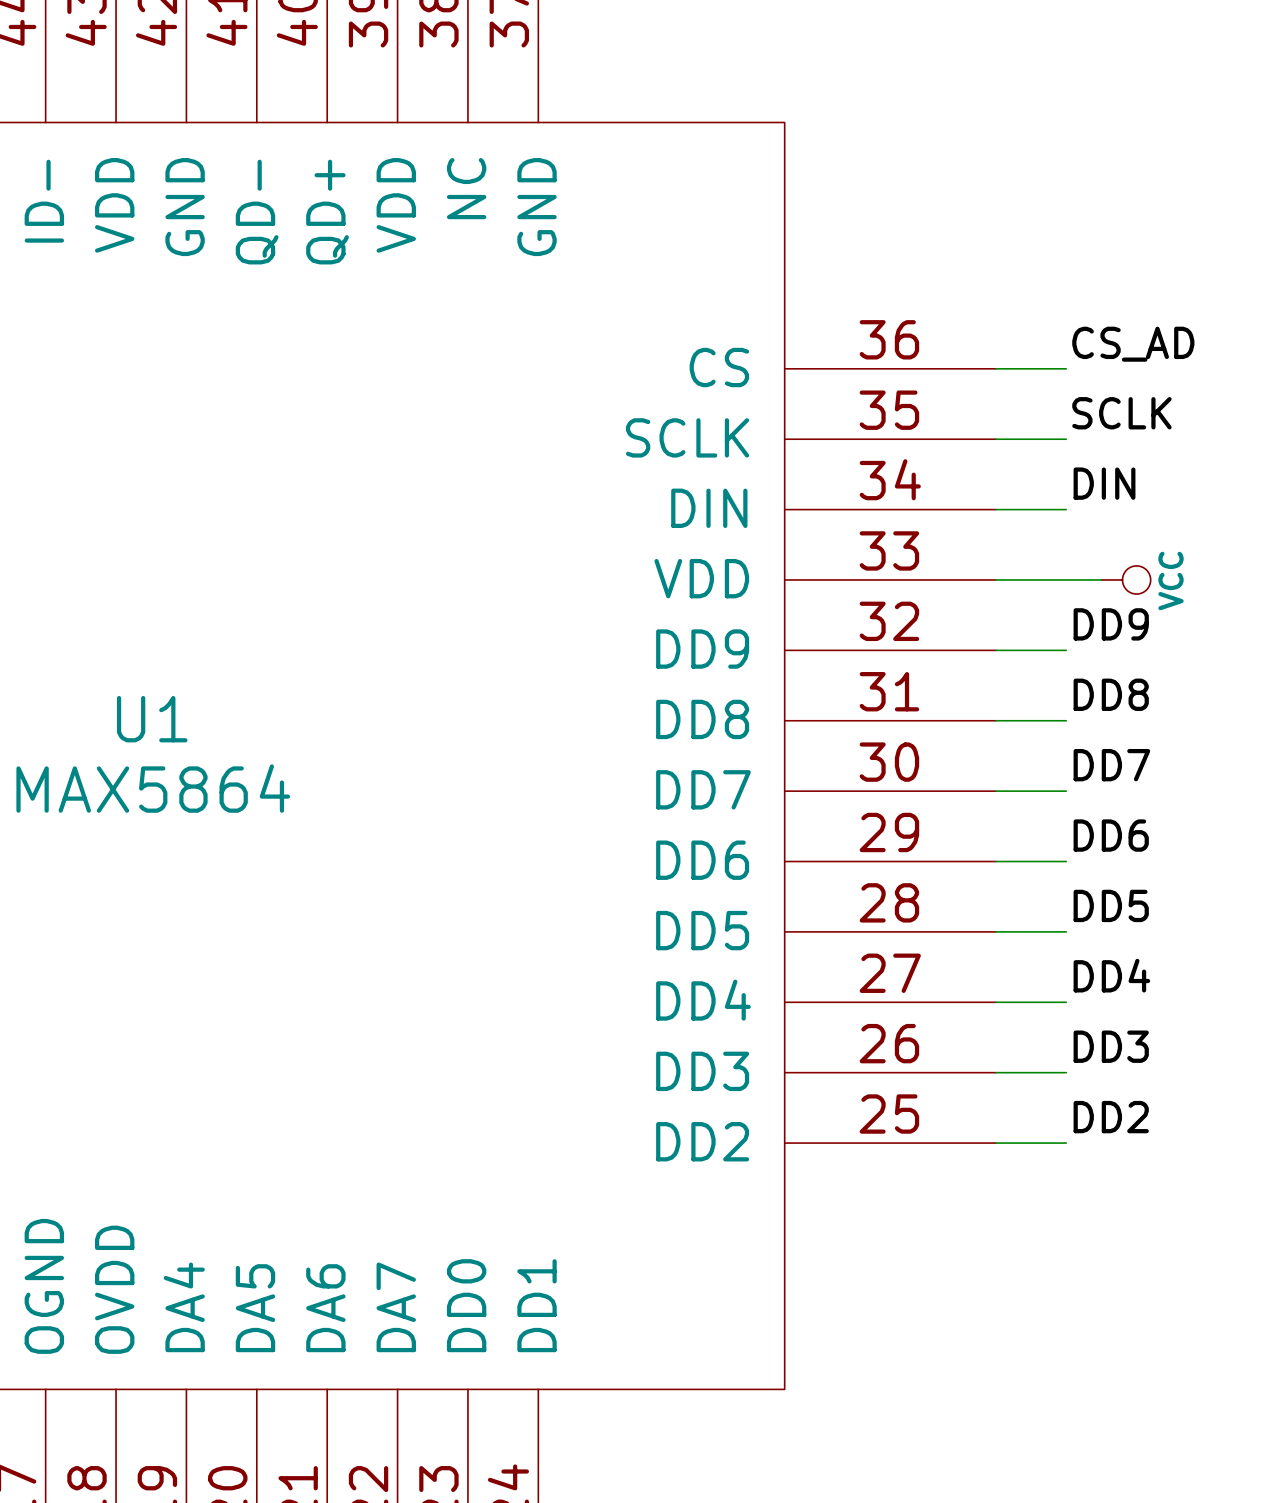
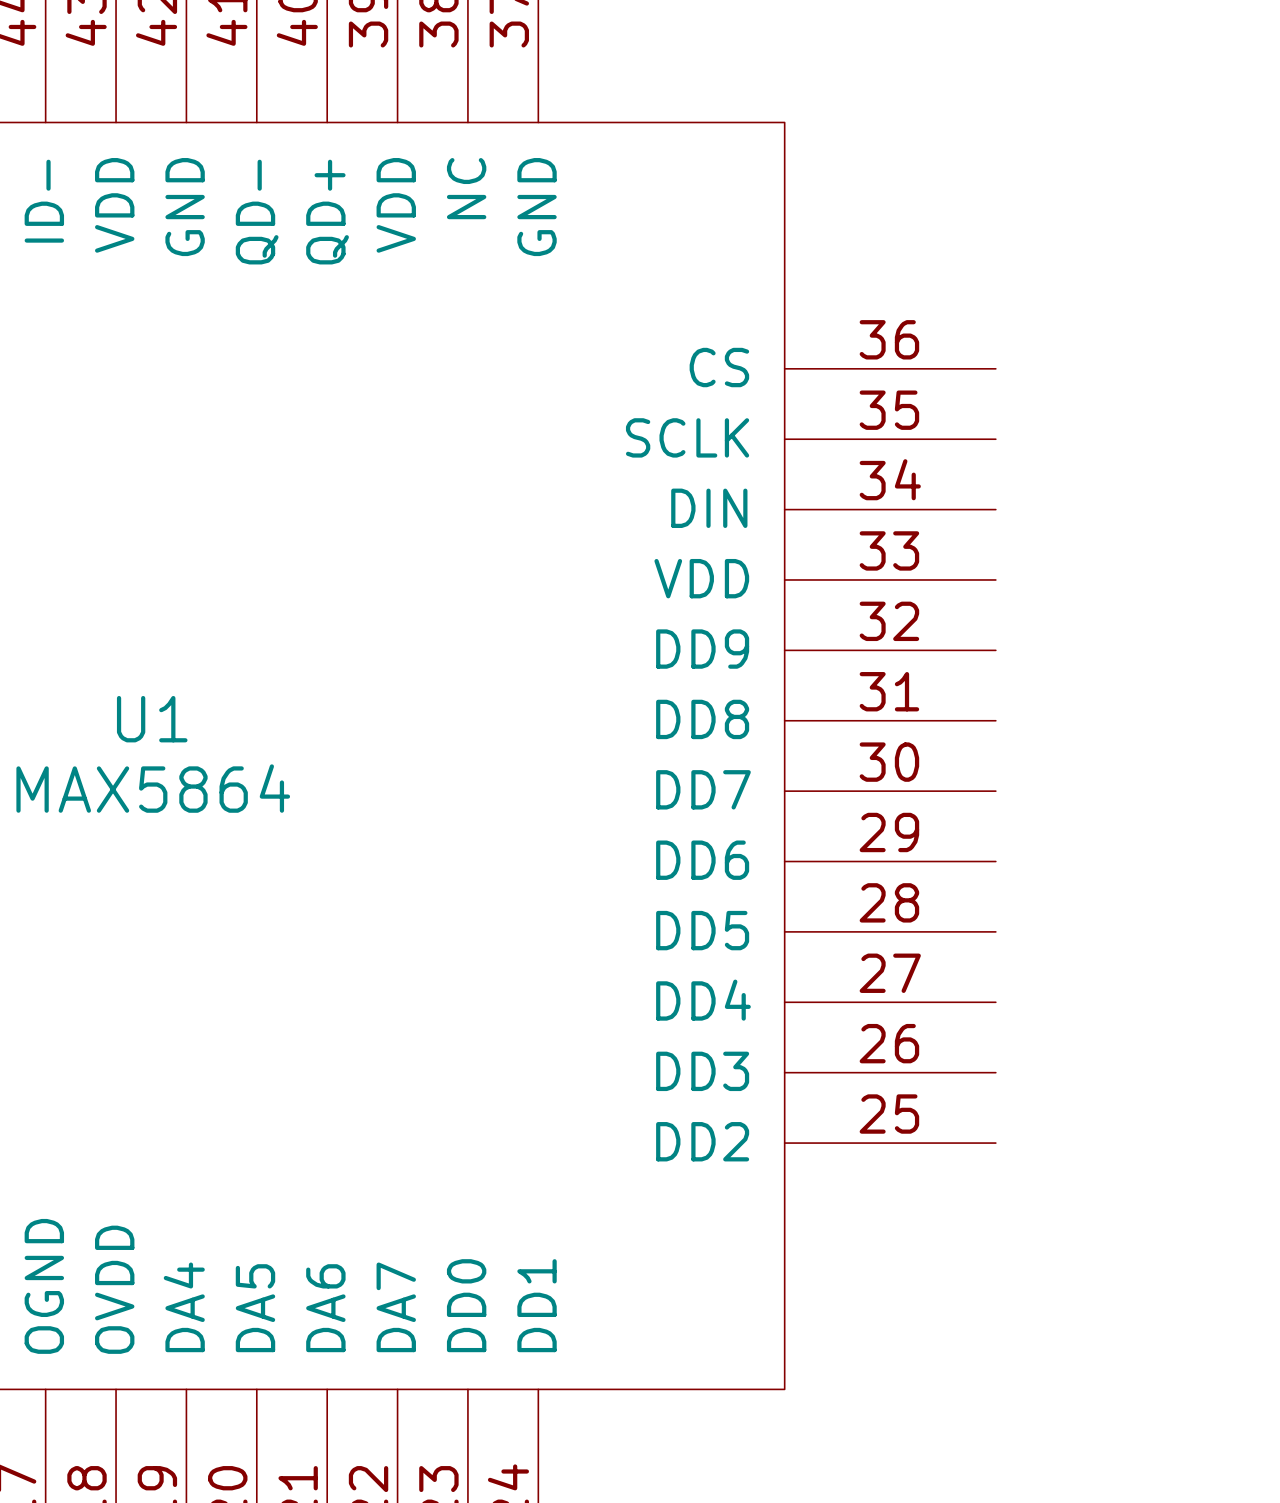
label: CS_AD (1133, 344) -> none
wire: (995, 368) (1066, 368) -> none
label: SCLK (1121, 413) -> none
wire: (995, 439) (1066, 439) -> none
label: DIN (1104, 483) -> none
wire: (995, 509) (1066, 509) -> none
wire: (995, 579) (1101, 579) -> none
power symbol: VCC (1126, 579) -> none
label: DD9 (1111, 624) -> none
wire: (995, 650) (1066, 650) -> none
label: DD8 (1111, 694) -> none
wire: (995, 720) (1066, 720) -> none
label: DD7 (1111, 765) -> none
wire: (995, 791) (1066, 791) -> none
label: DD6 (1111, 835) -> none
wire: (995, 861) (1066, 861) -> none
label: DD5 (1111, 905) -> none
wire: (995, 931) (1066, 931) -> none
label: DD4 (1111, 975) -> none
wire: (995, 1002) (1066, 1002) -> none
label: DD3 (1111, 1046) -> none
wire: (995, 1072) (1066, 1072) -> none
label: DD2 (1111, 1117) -> none
wire: (995, 1143) (1066, 1143) -> none

